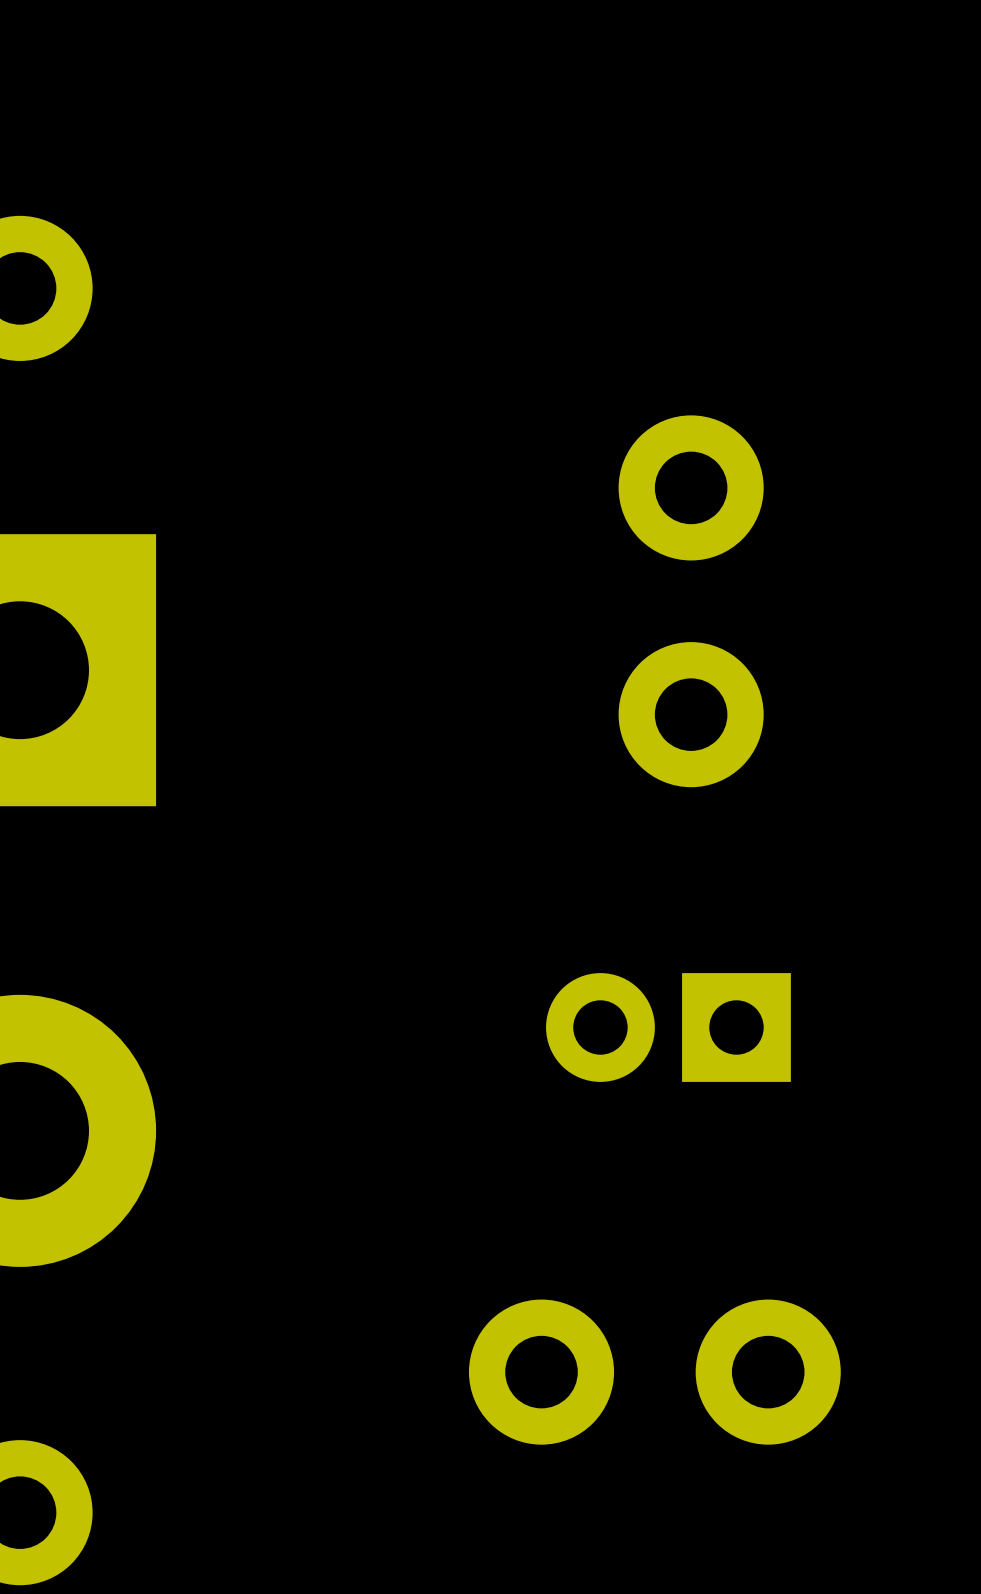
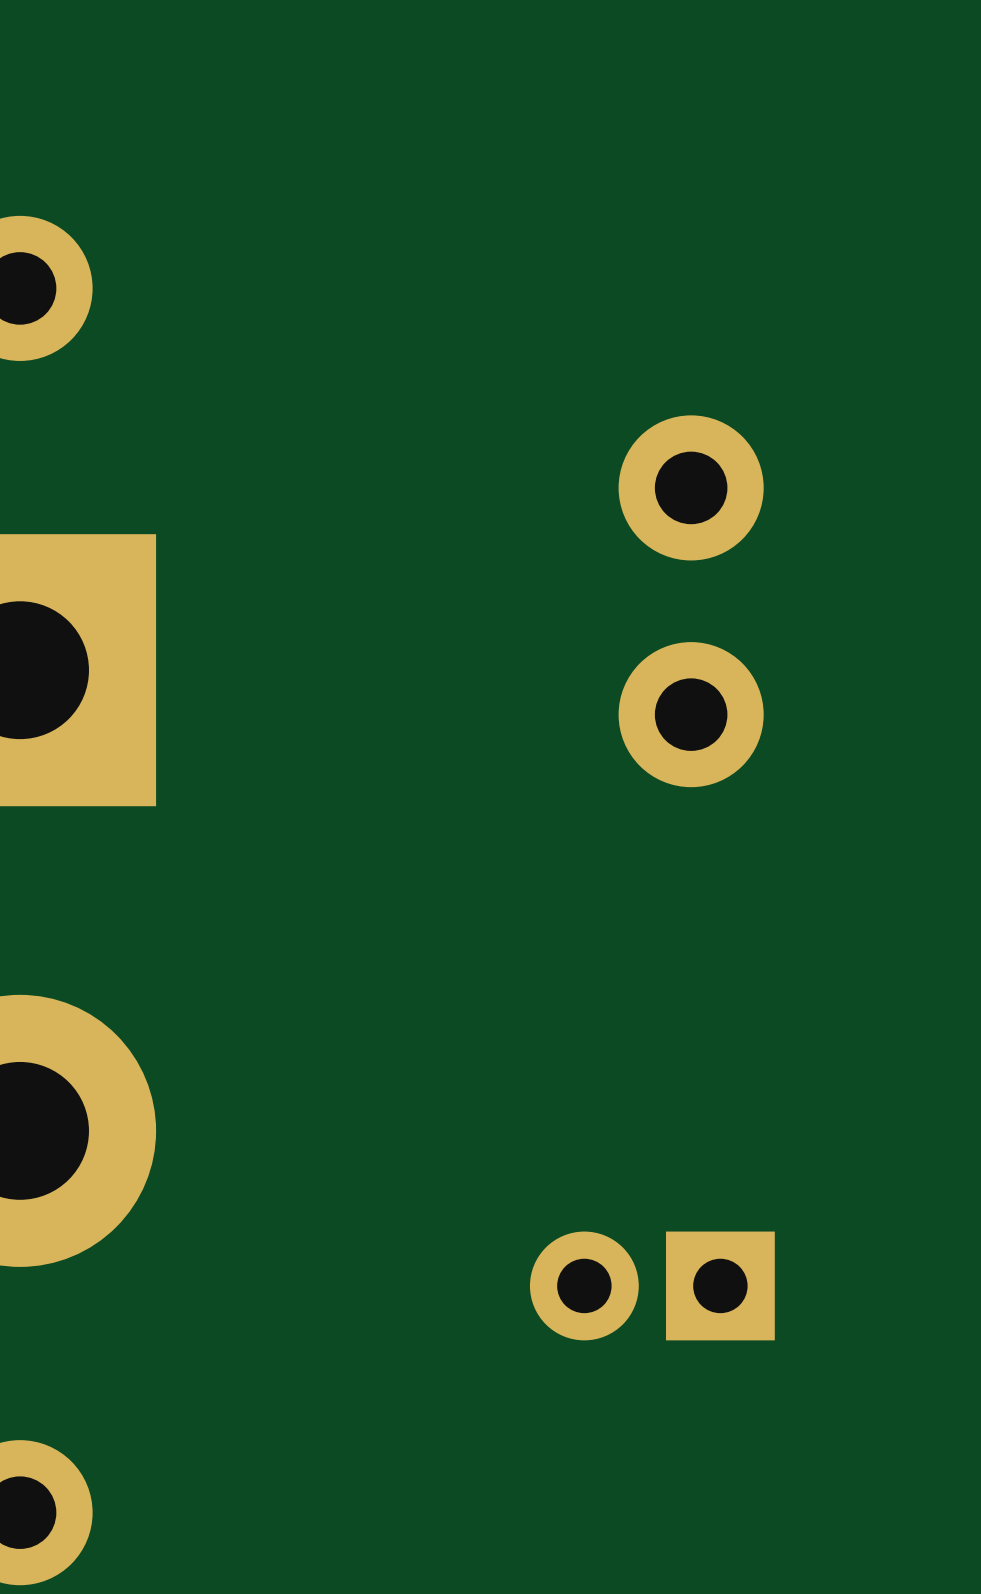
part: (668, 1027) -> none
part footprint: [468, 1299, 841, 1445] -> [529, 1231, 775, 1341]

